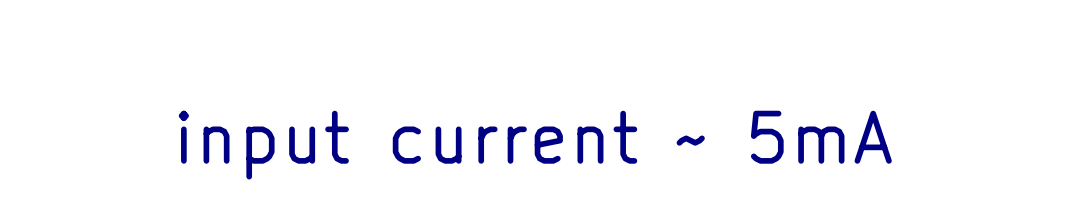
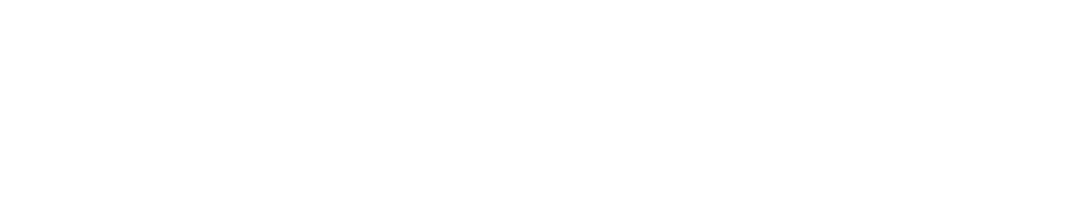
text: input current ~ 5mA (535, 145) -> none

